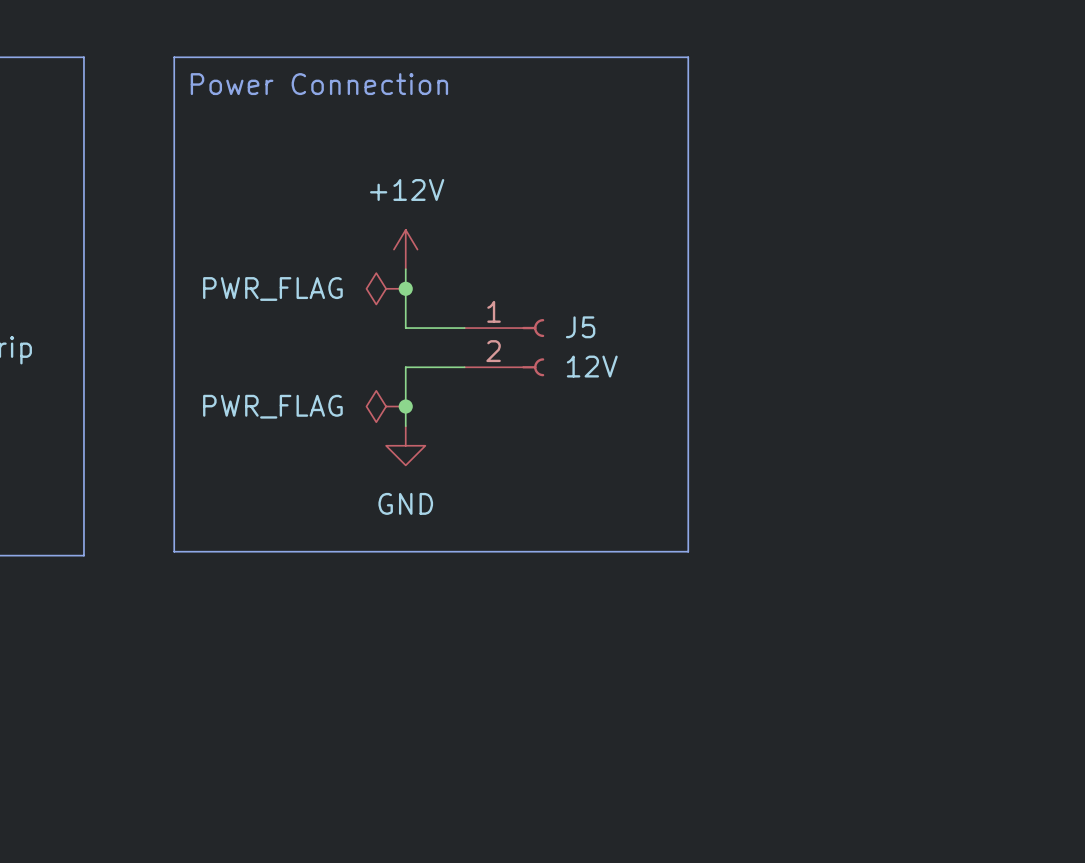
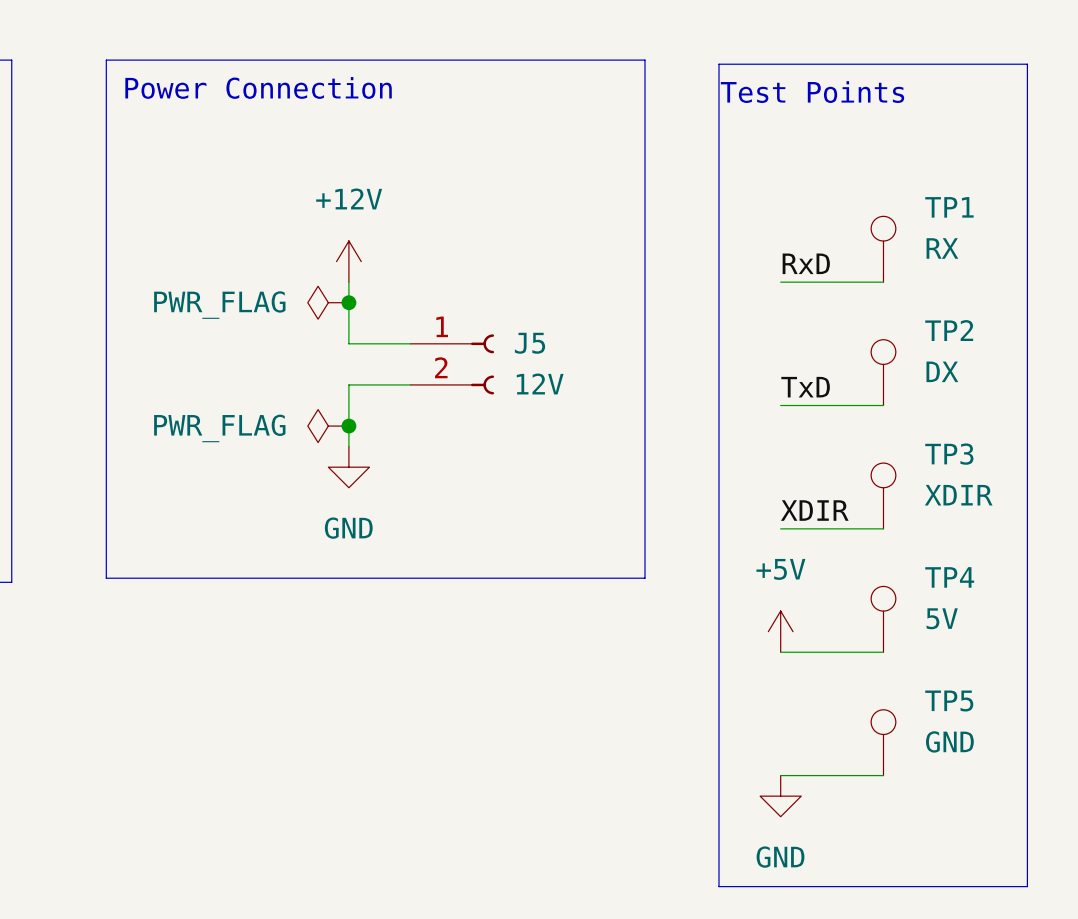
line: none -> (719, 64) (1027, 64) (1027, 886) (719, 886) (719, 64)
text: none -> Test Points (812, 92)
TP1: none -> RX (883, 249)
label: none -> RxD (806, 263)
wire: none -> (780, 282) (883, 282)
TP2: none -> DX (883, 372)
label: none -> TxD (805, 387)
wire: none -> (780, 405) (883, 405)
TP3: none -> XDIR (883, 495)
label: none -> XDIR (814, 510)
wire: none -> (780, 528) (883, 528)
TP4: none -> 5V (883, 619)
power symbol: none -> +5V (780, 631)
wire: none -> (780, 652) (883, 652)
TP5: none -> GND (883, 742)
wire: none -> (780, 775) (883, 775)
power symbol: none -> GND (780, 796)

